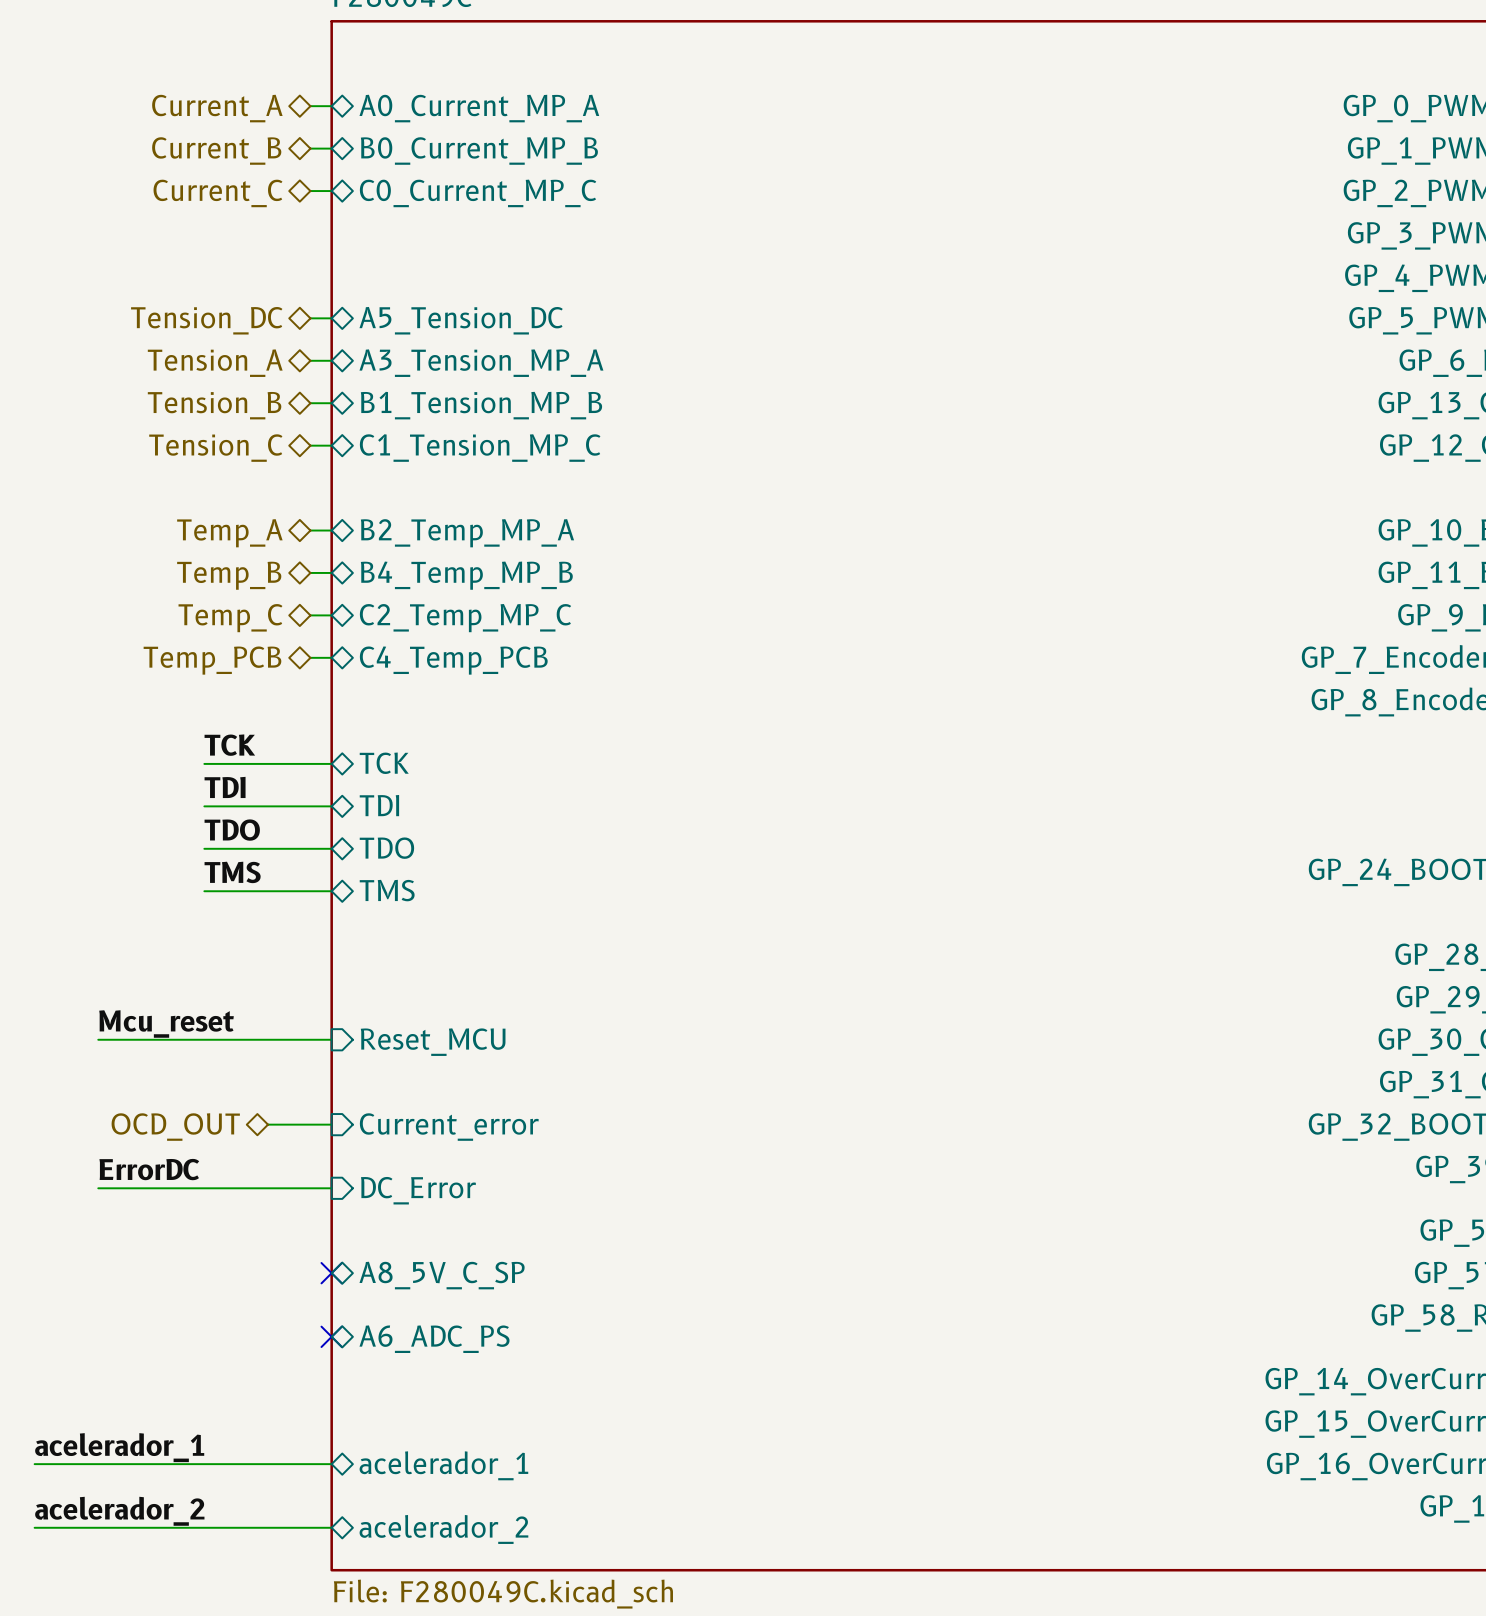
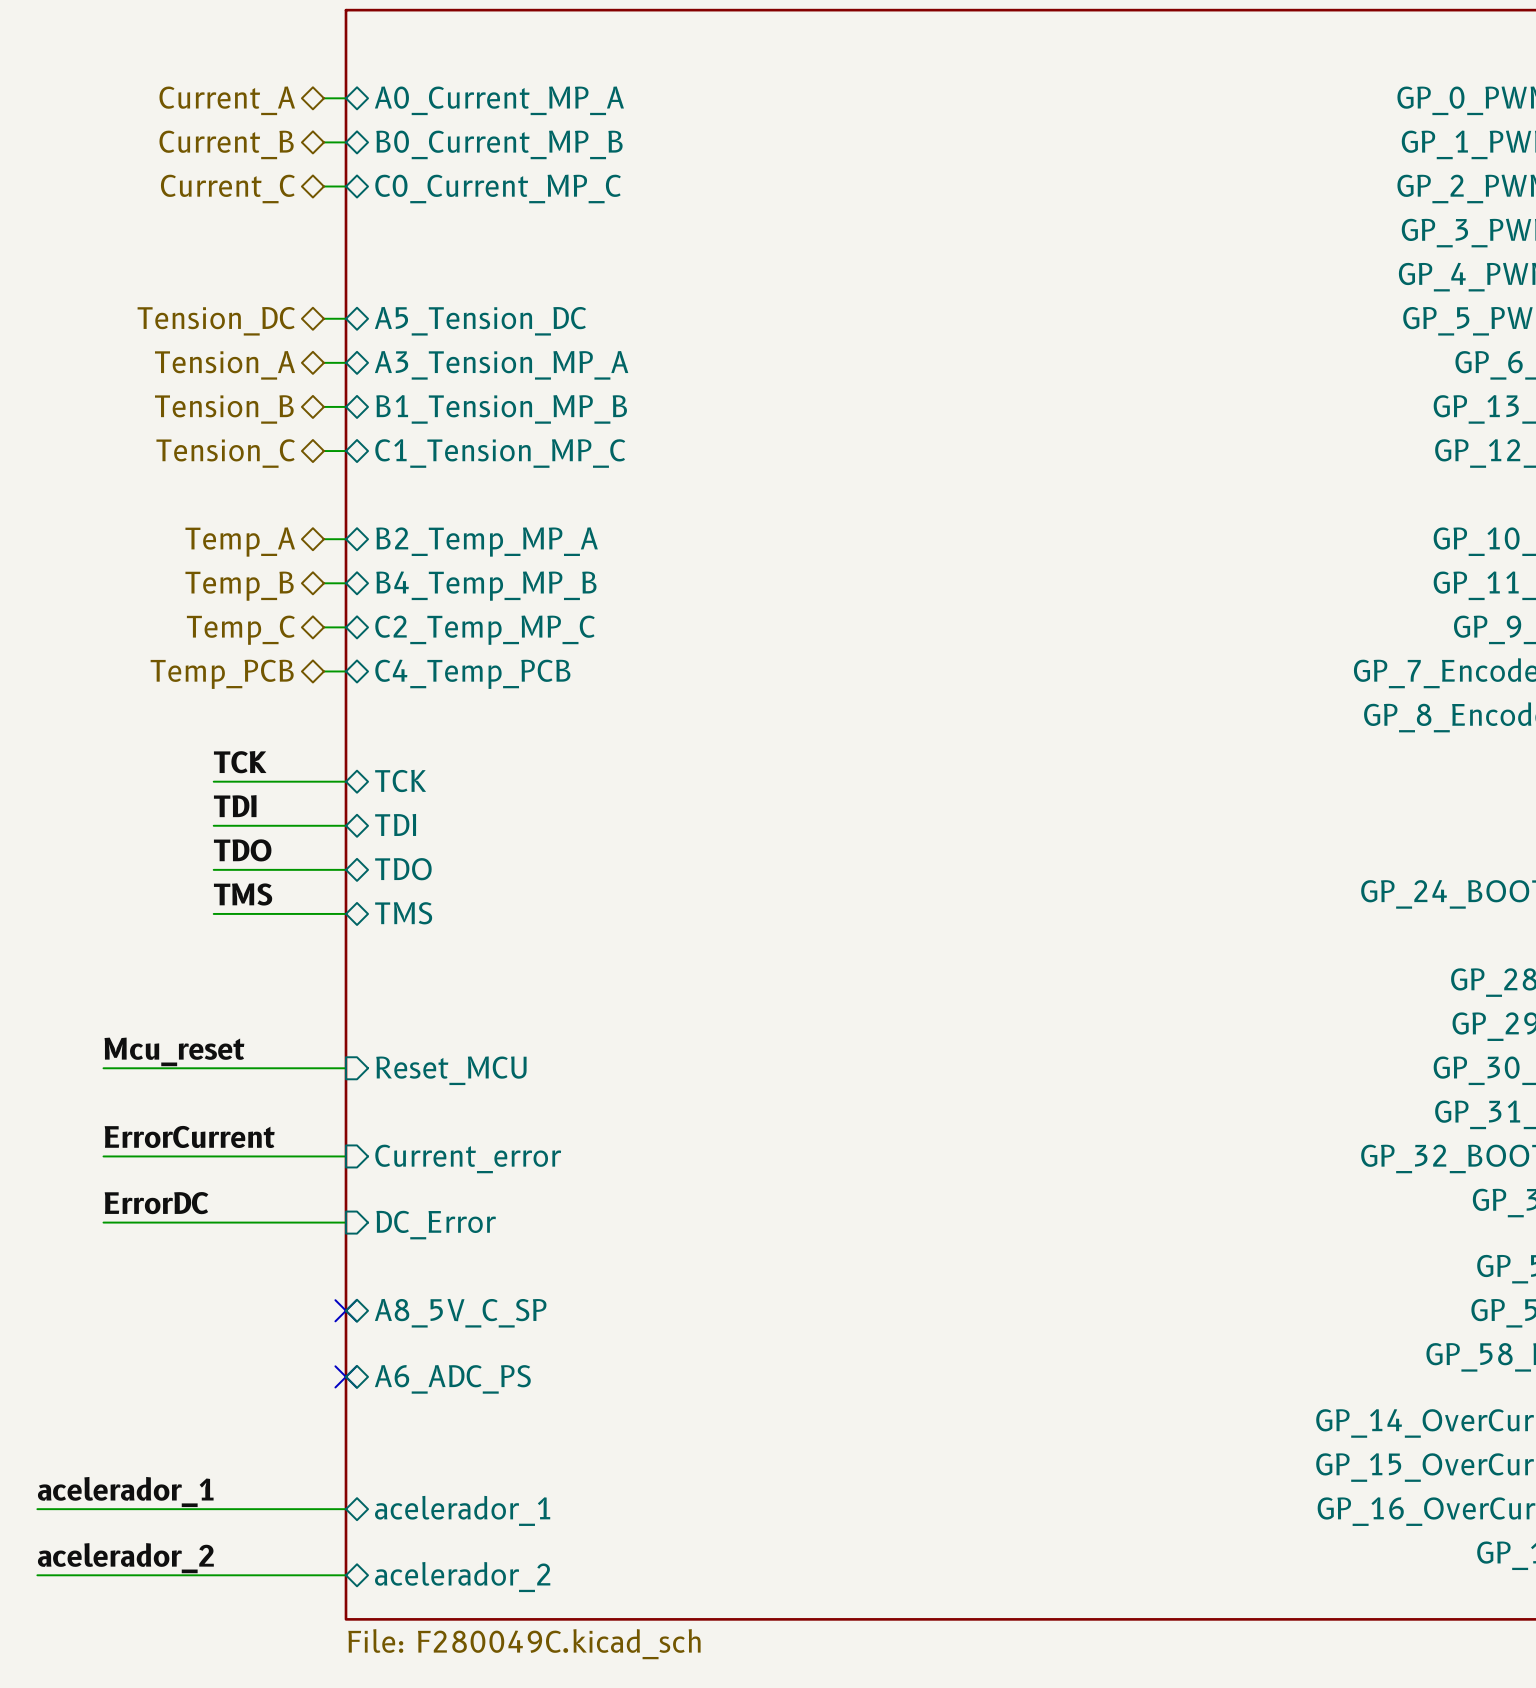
label: none -> ErrorCurrent (189, 1136)
wire: none -> (103, 1156) (279, 1156)
hierarchical label: OCD_OUT (175, 1127) -> none

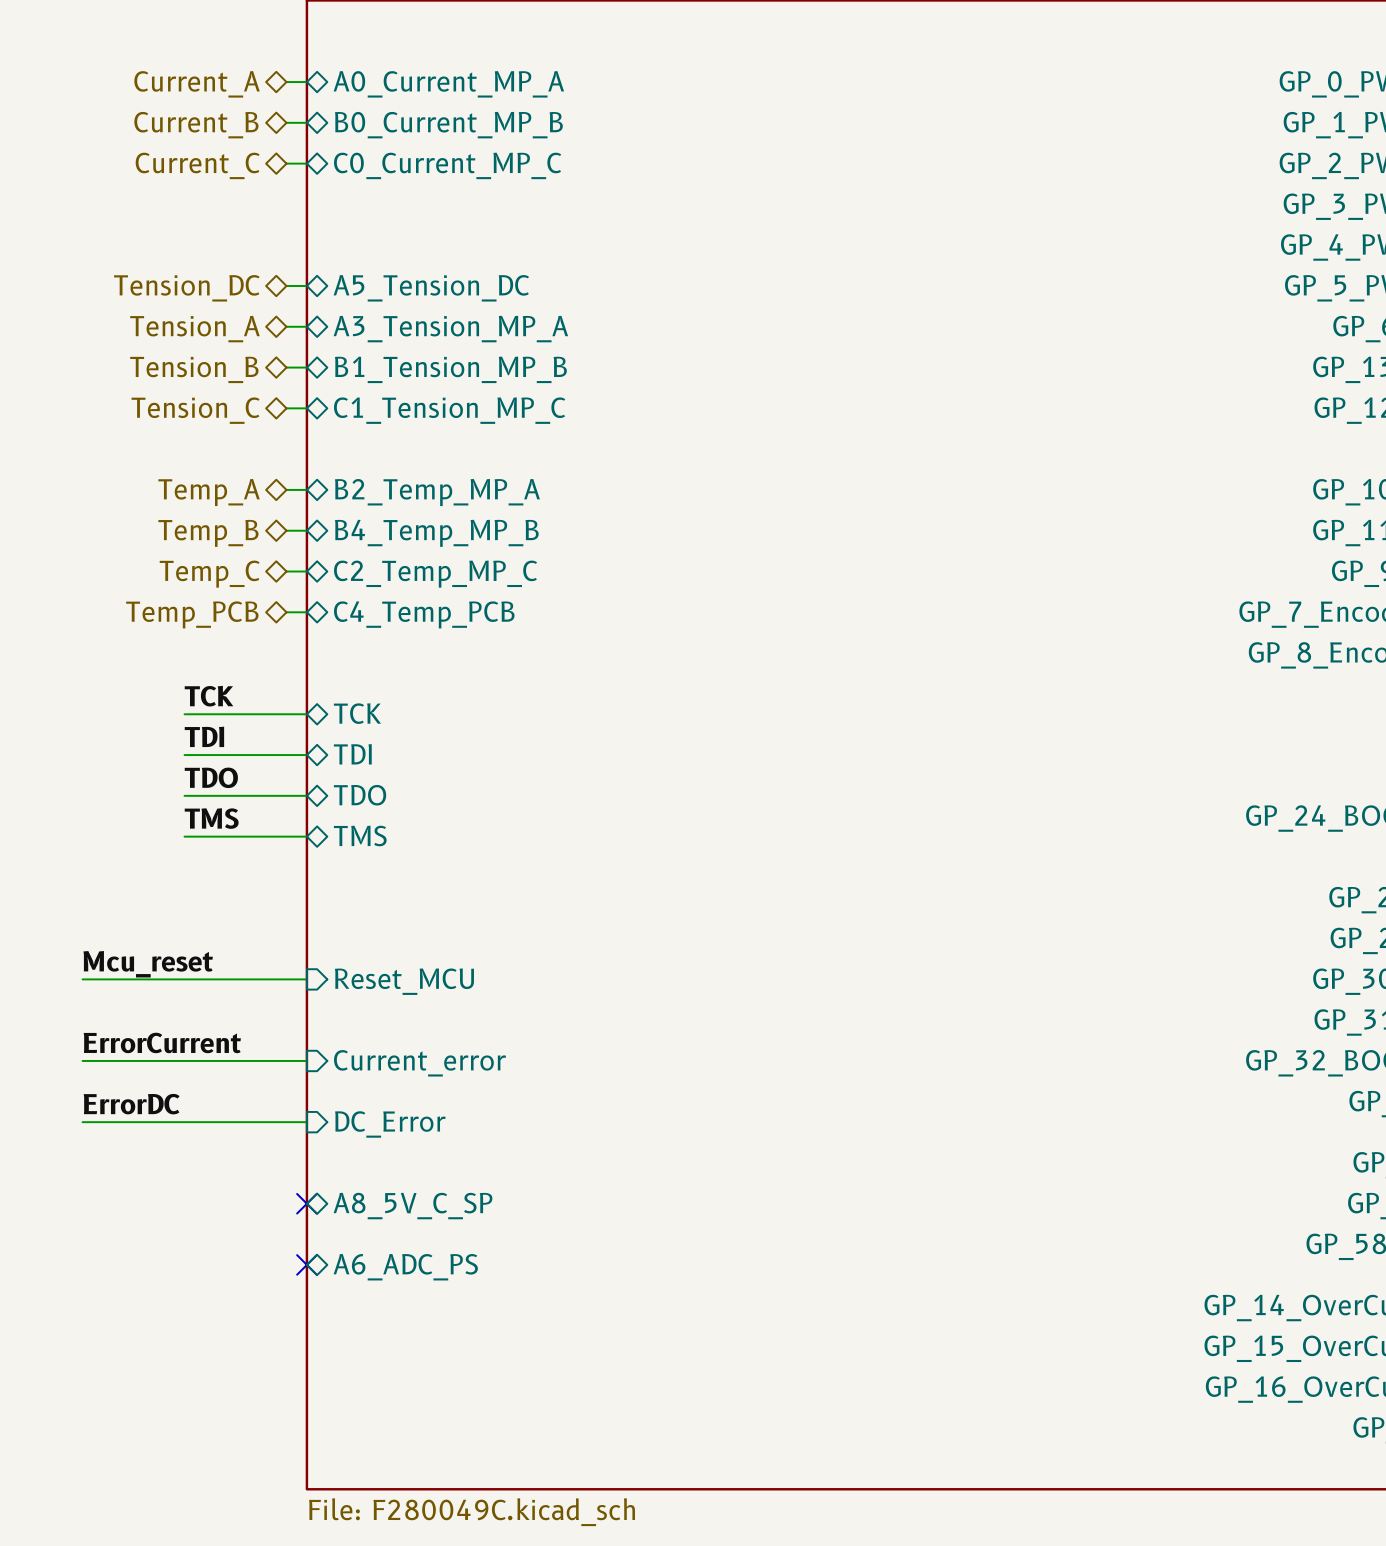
label: acelerador_1 (125, 1492) -> none
wire: (37, 1509) (346, 1509) -> none
sheet pin: acelerador_1 (462, 1510) -> none
label: acelerador_2 (125, 1558) -> none
wire: (37, 1575) (346, 1575) -> none
sheet pin: acelerador_2 (462, 1577) -> none

